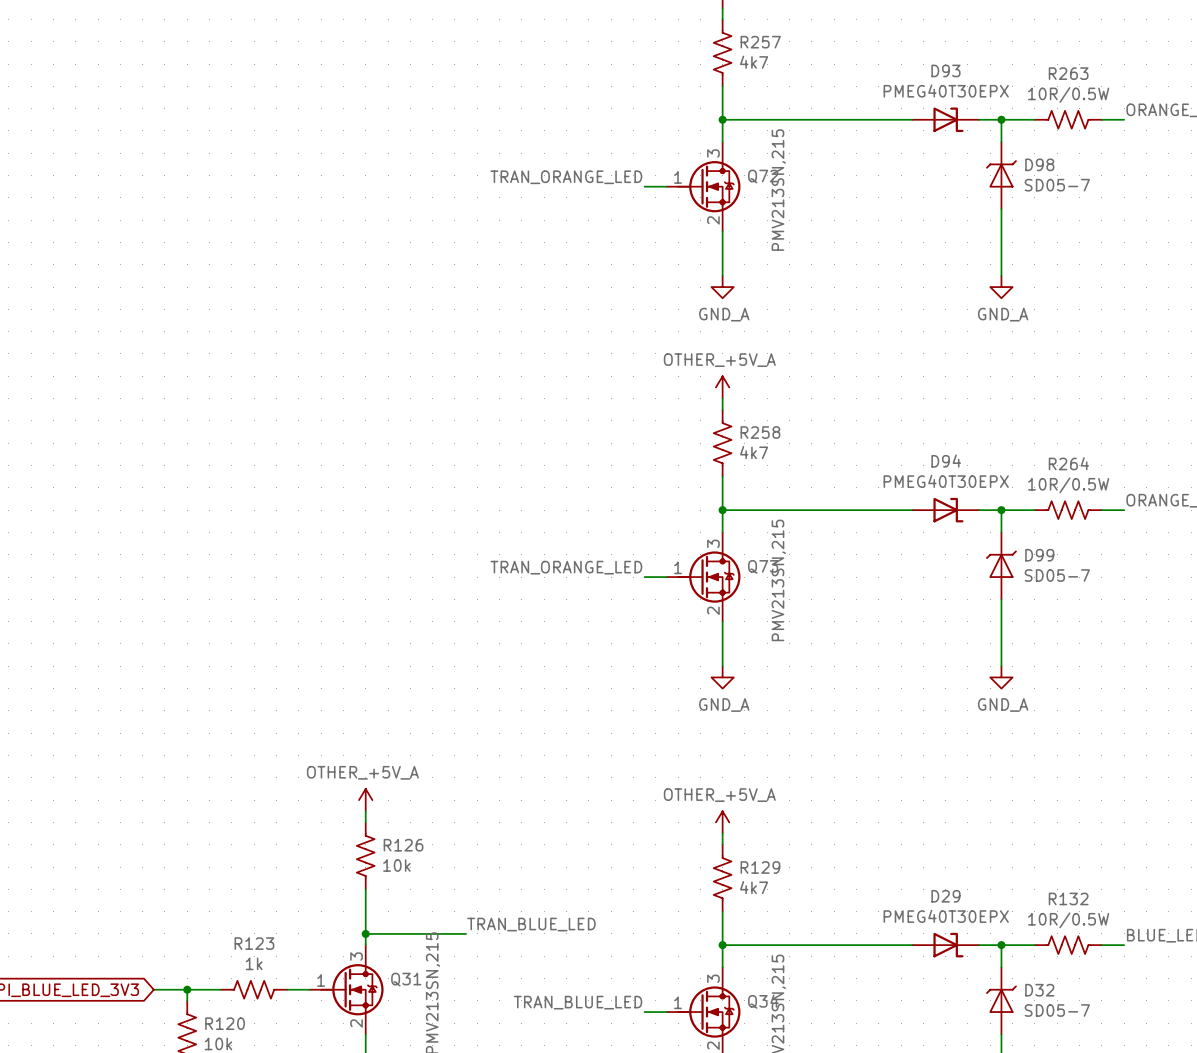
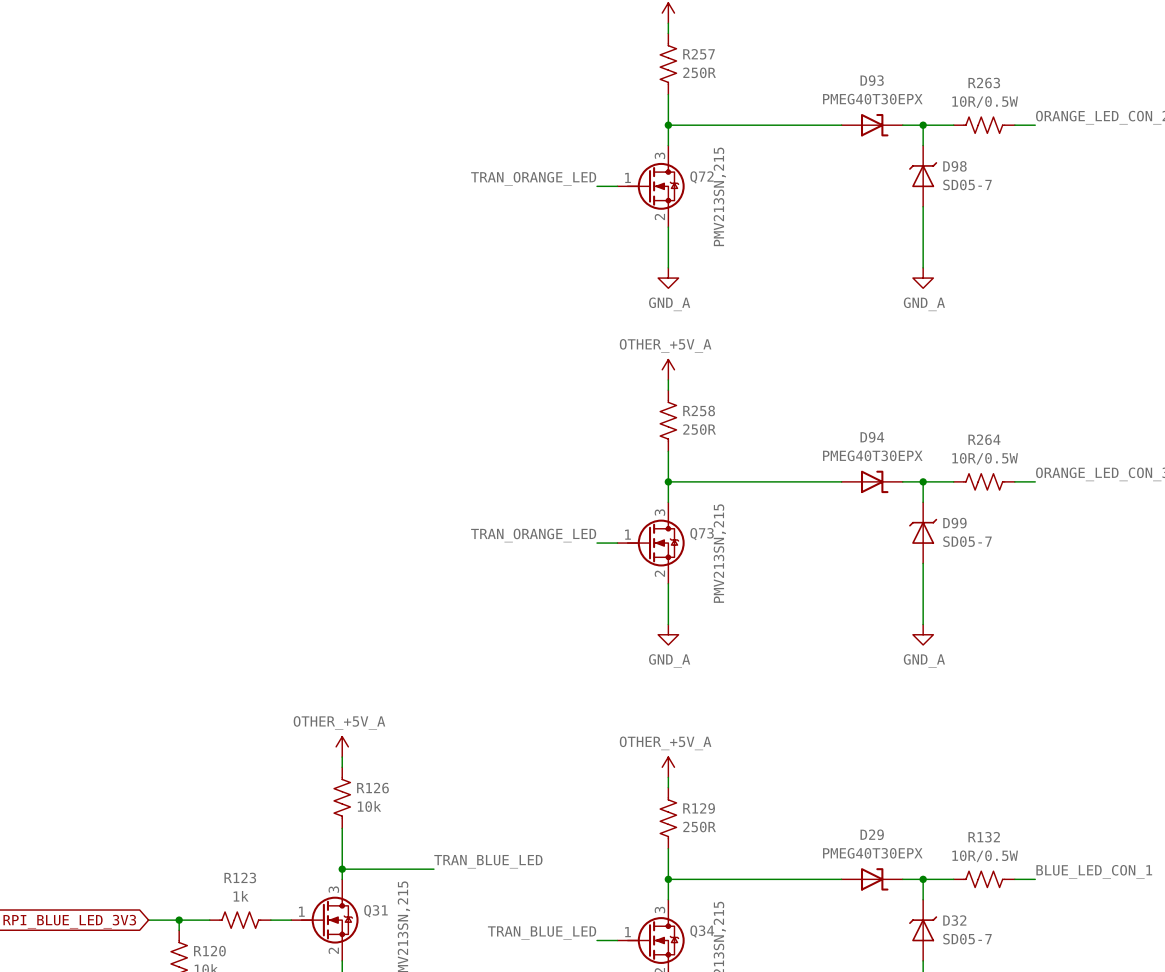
R257 value: 4k7 (754, 62) -> 250R (699, 72)
R258 value: 4k7 (754, 452) -> 250R (699, 429)
R129 value: 4k7 (754, 887) -> 250R (699, 827)

